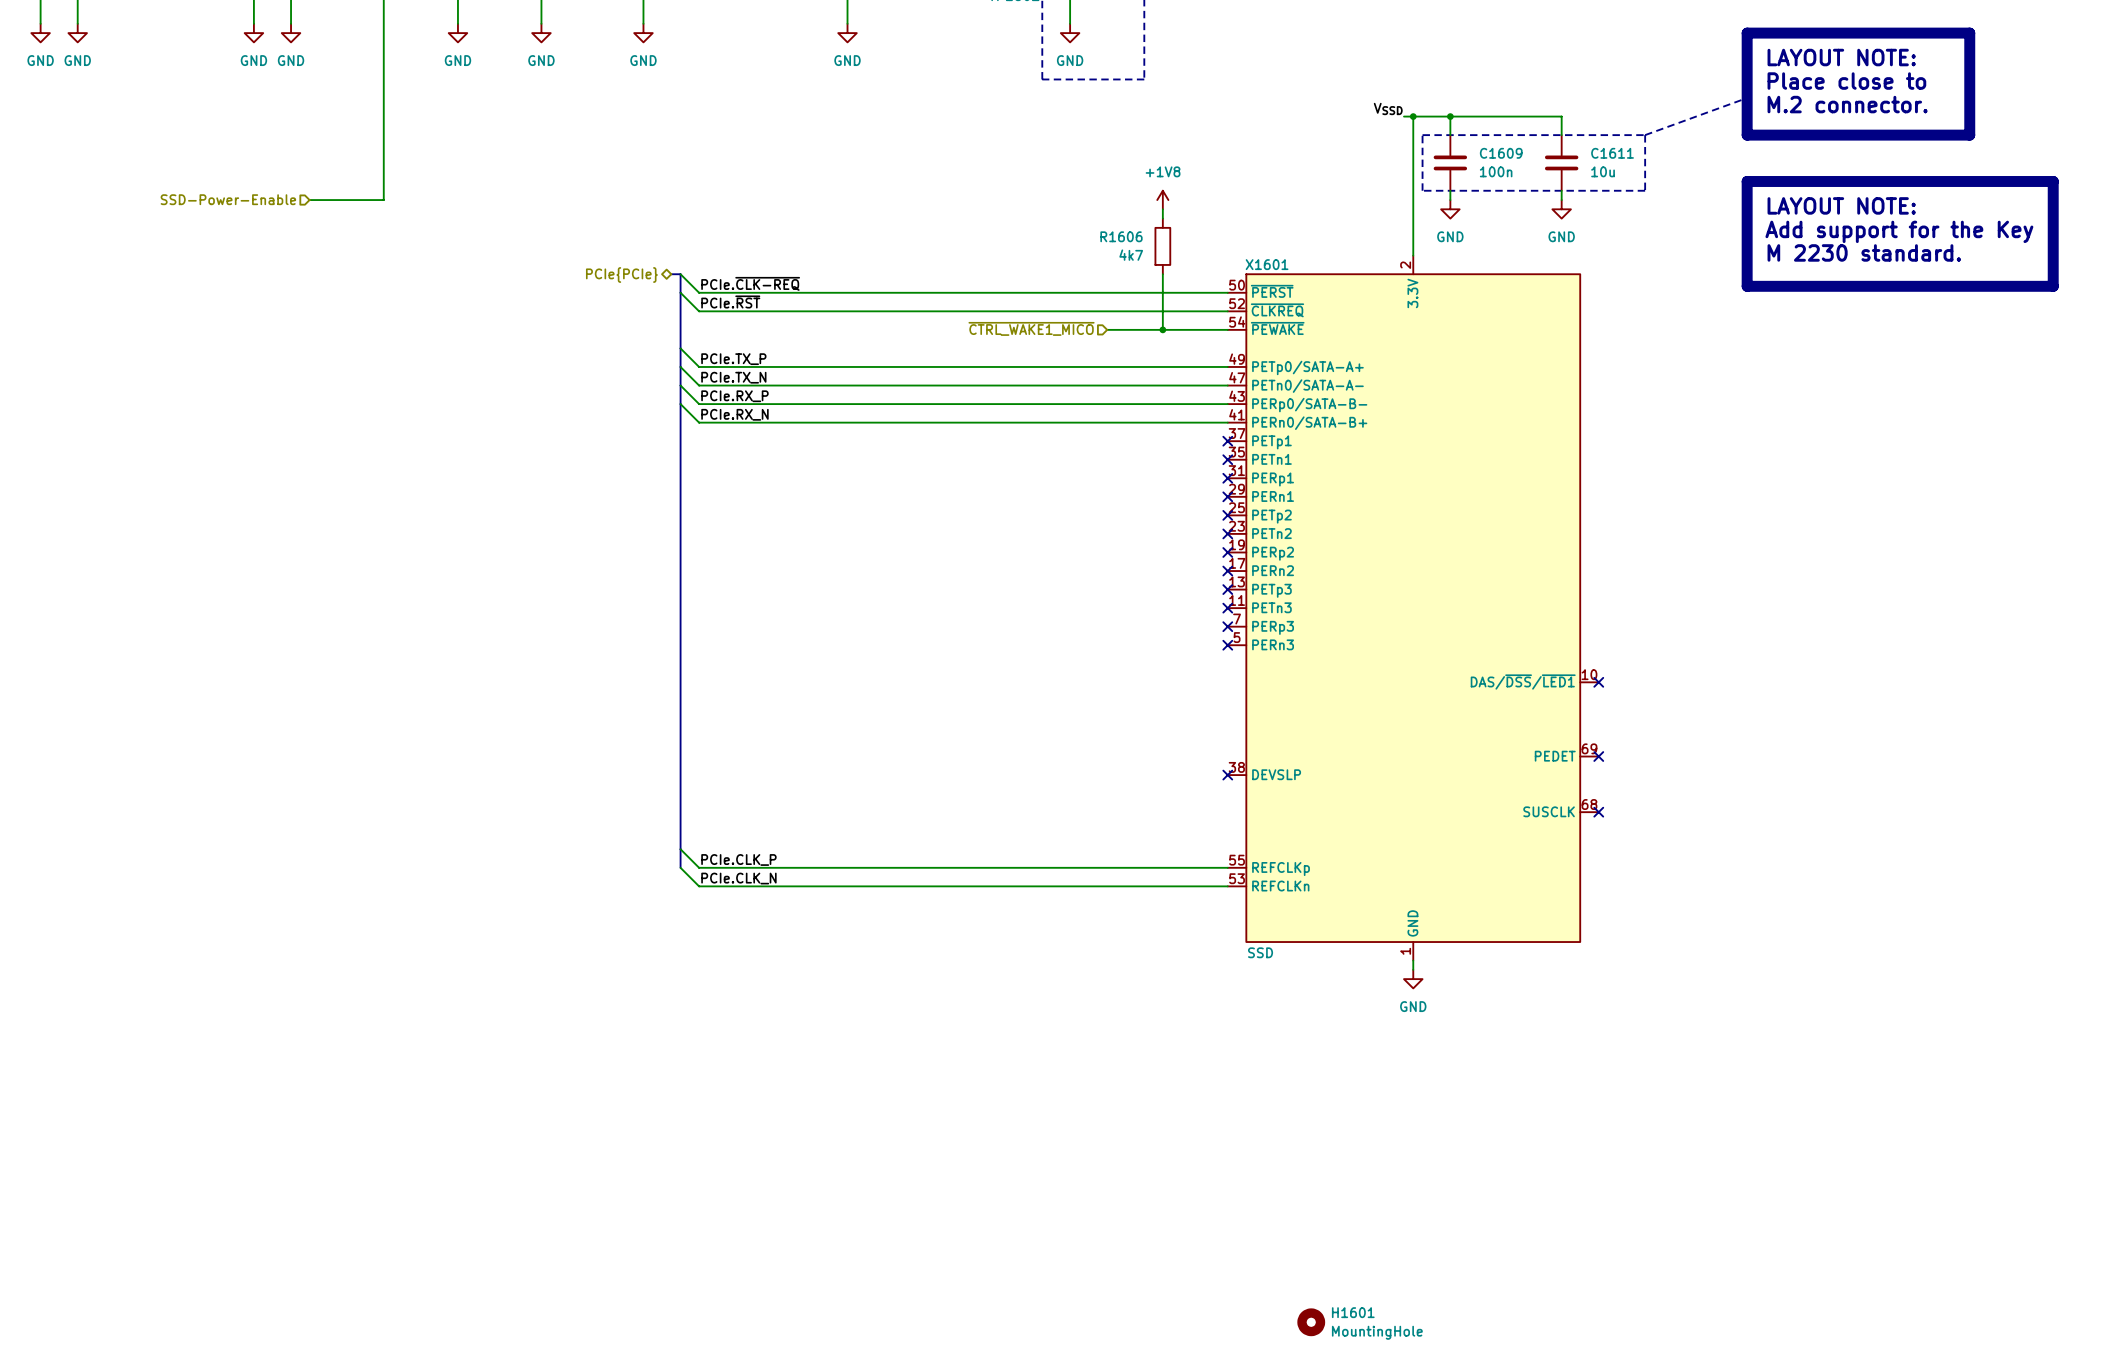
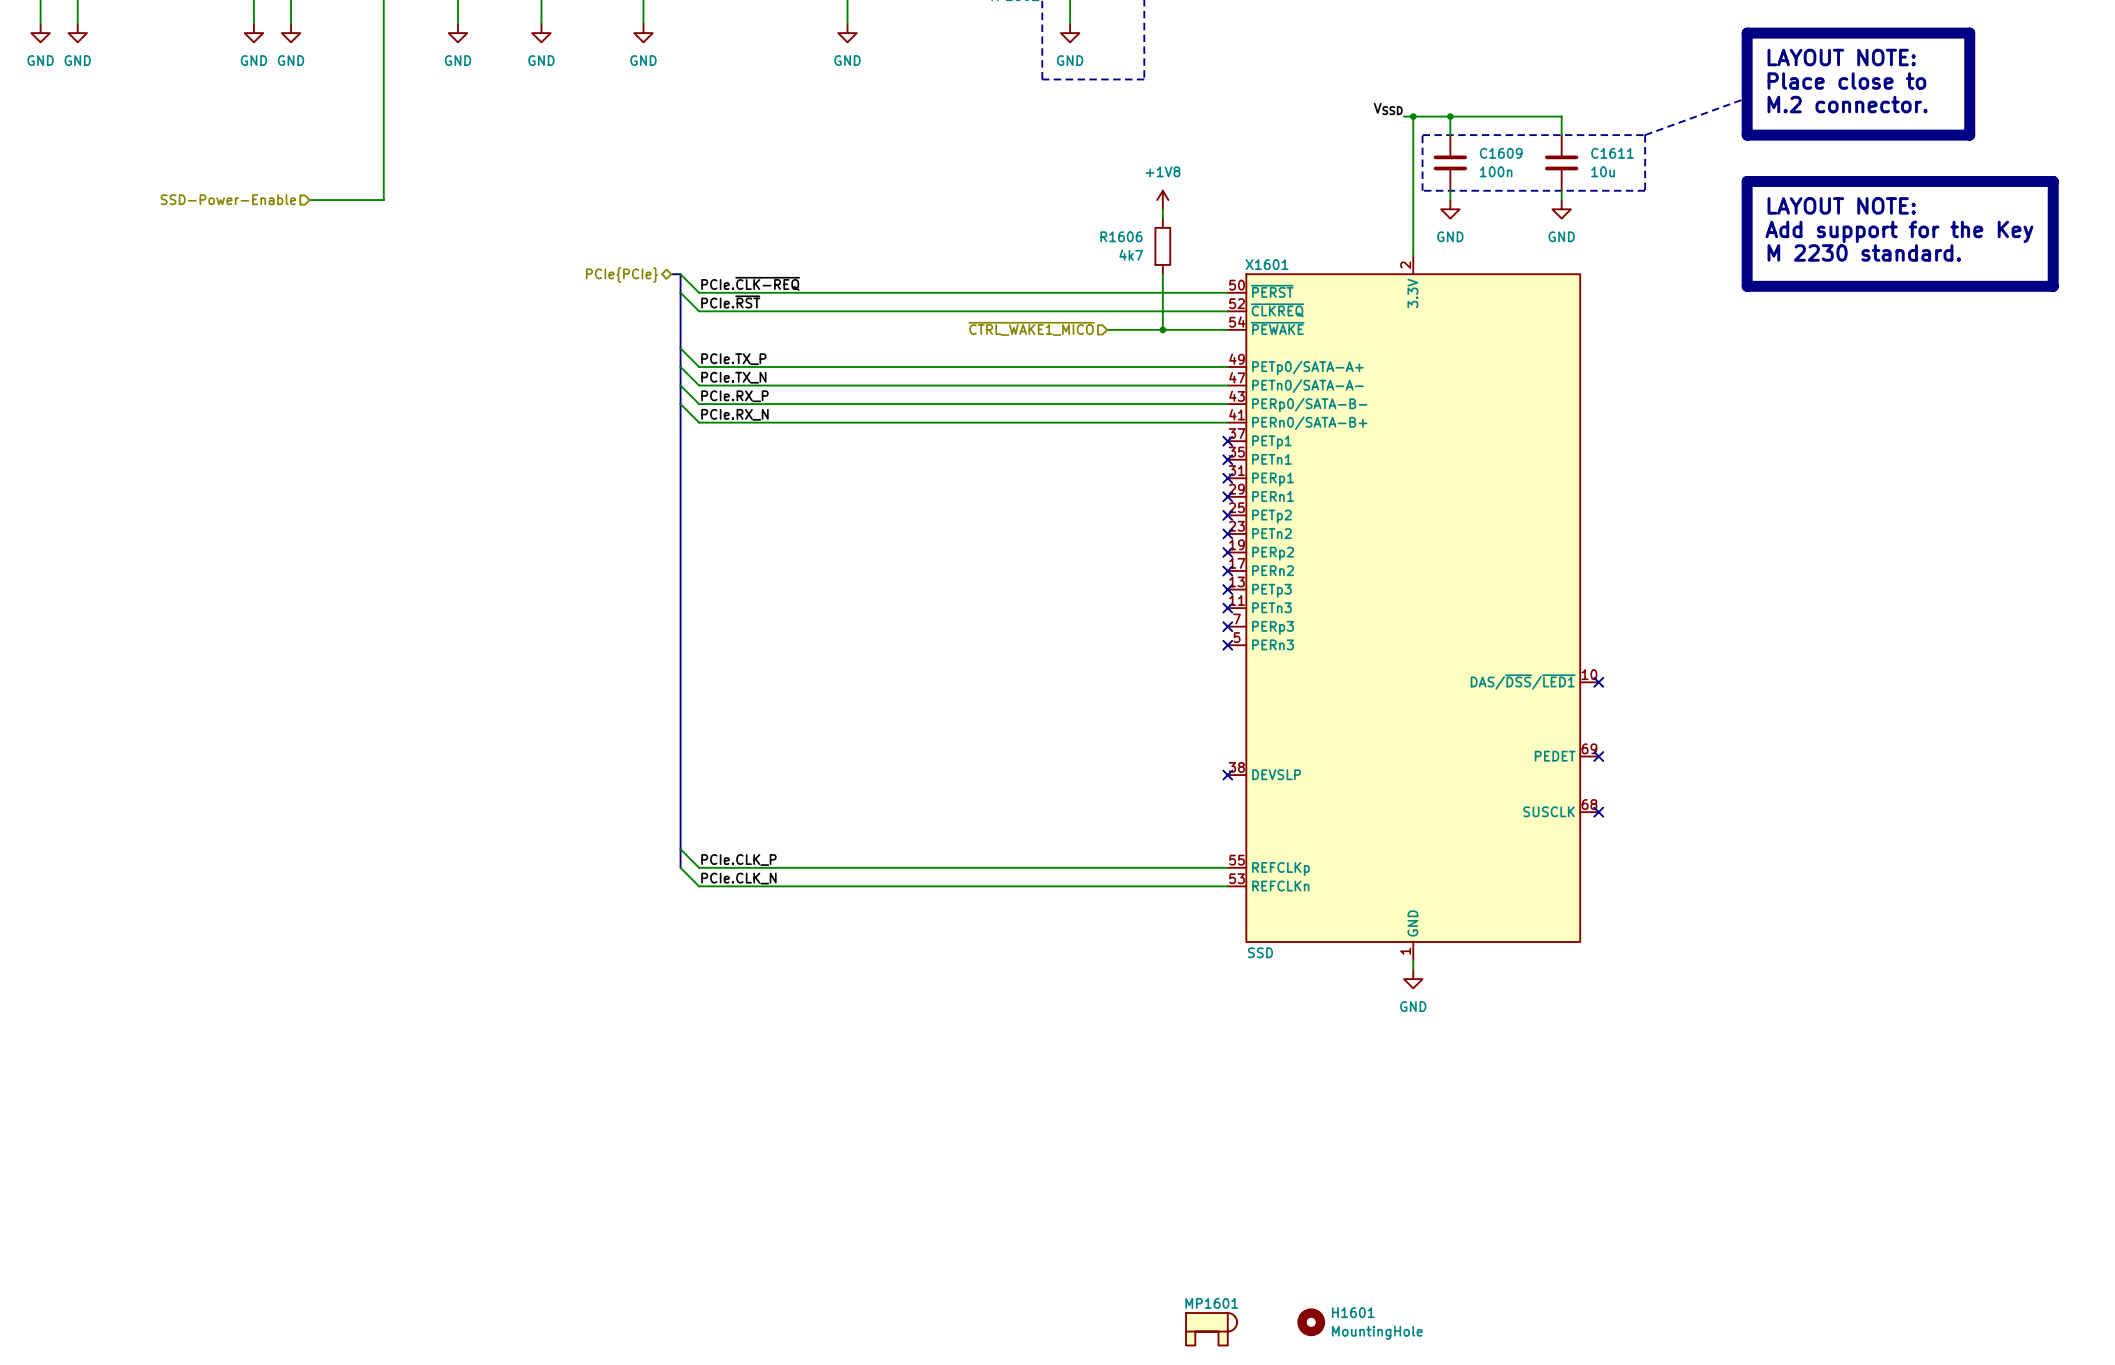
MP1601: none -> (1211, 1329)

